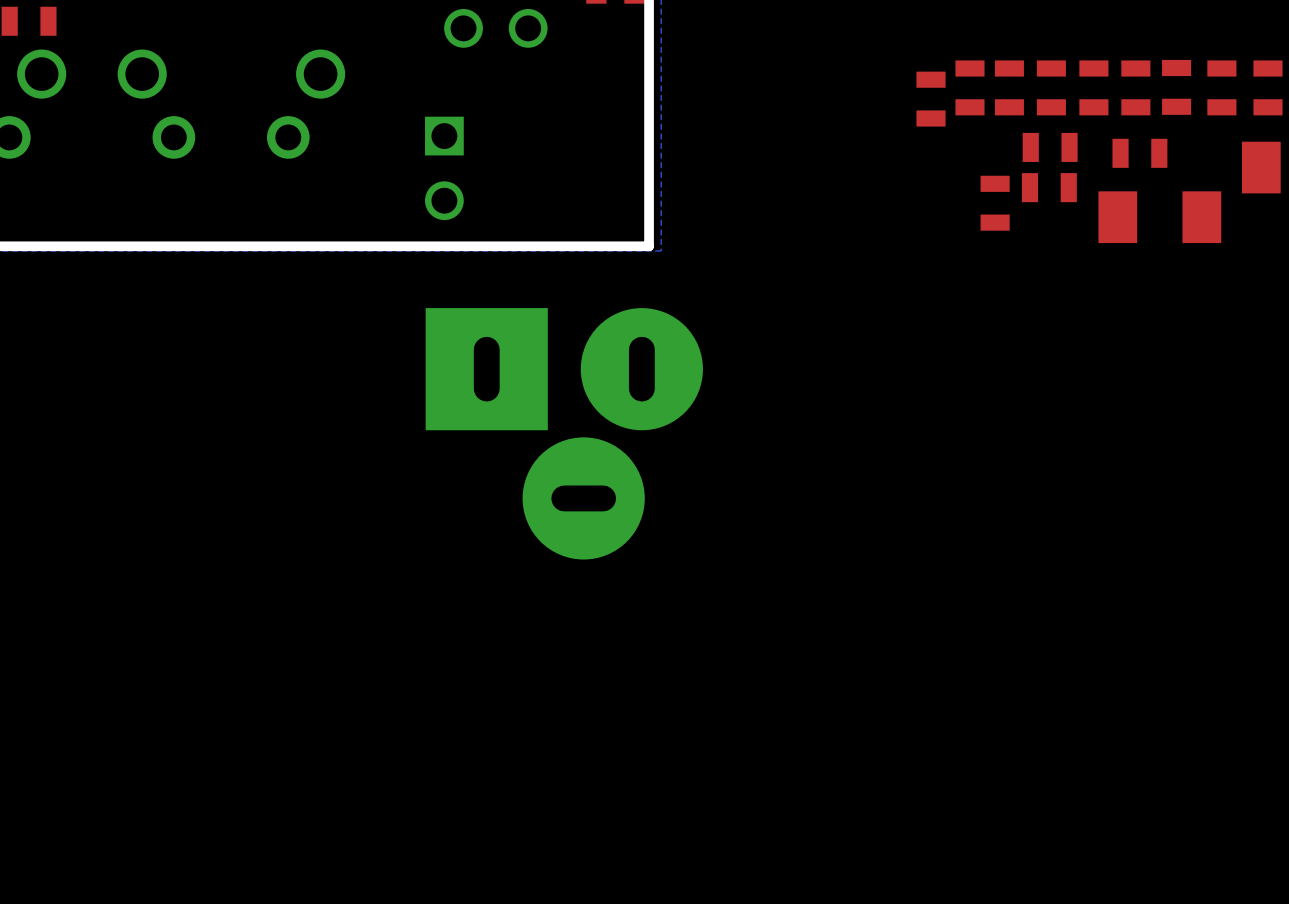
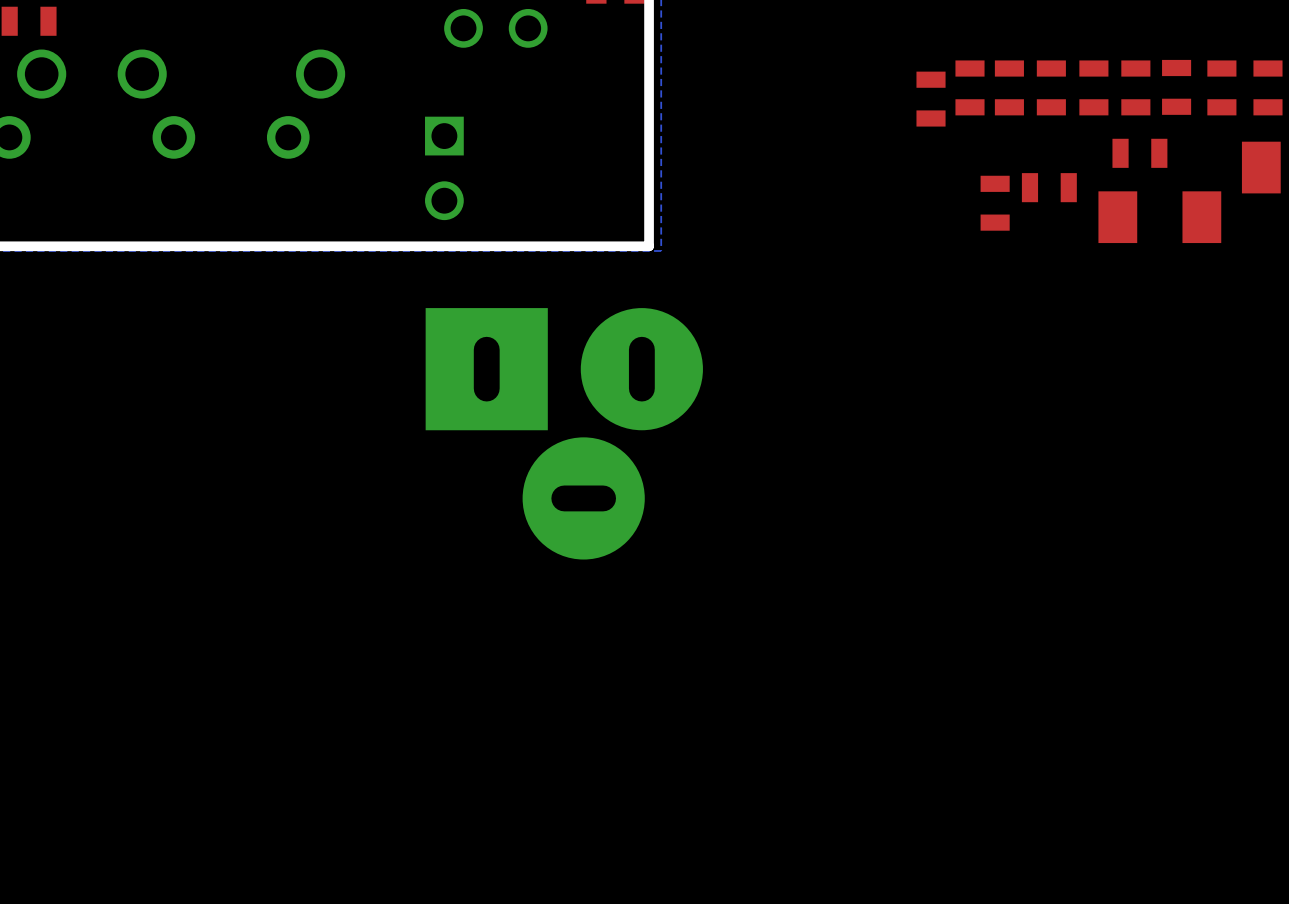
part: (1050, 147) -> none

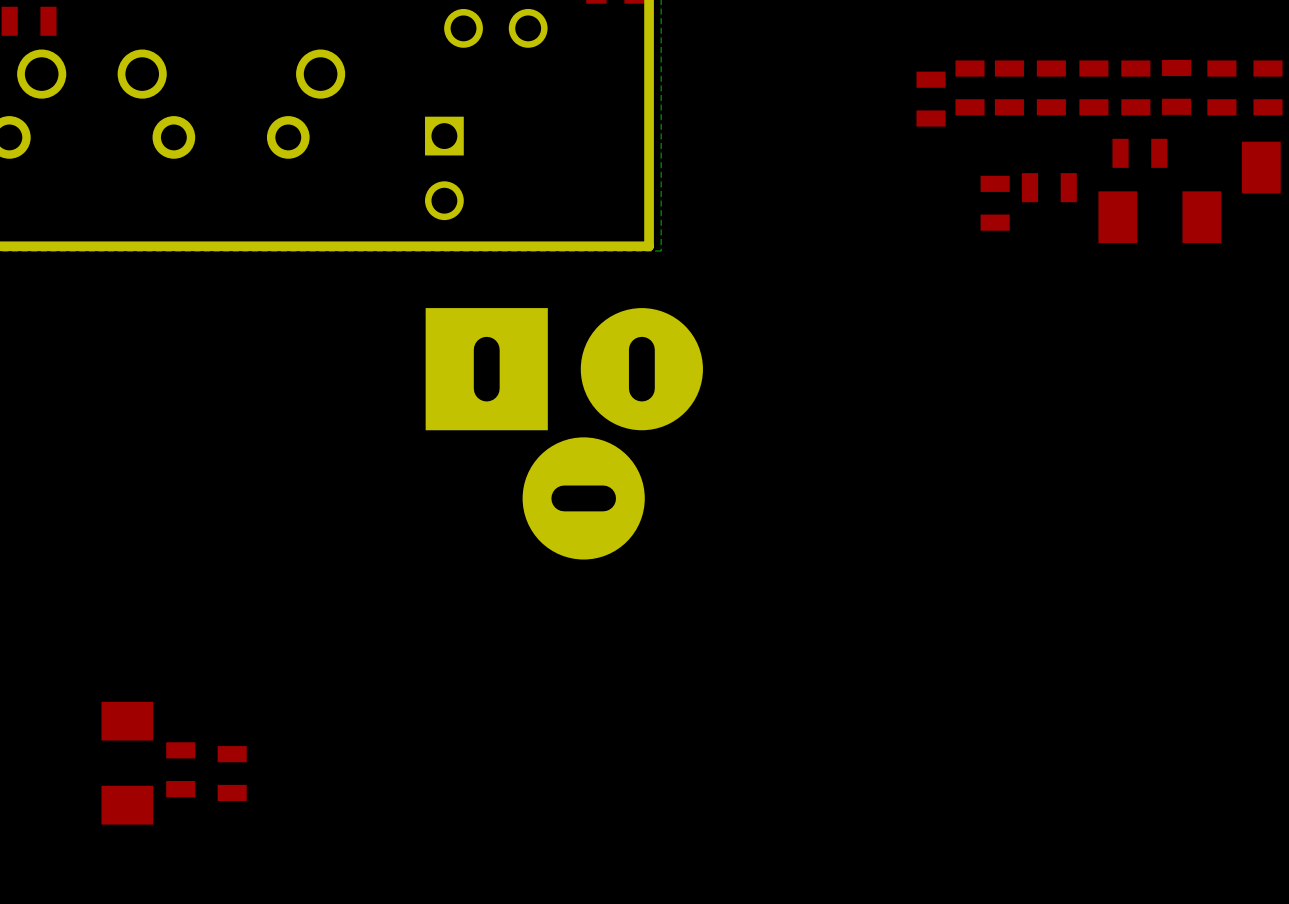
part: none -> (127, 763)
part: none -> (180, 769)
part: none -> (232, 773)

